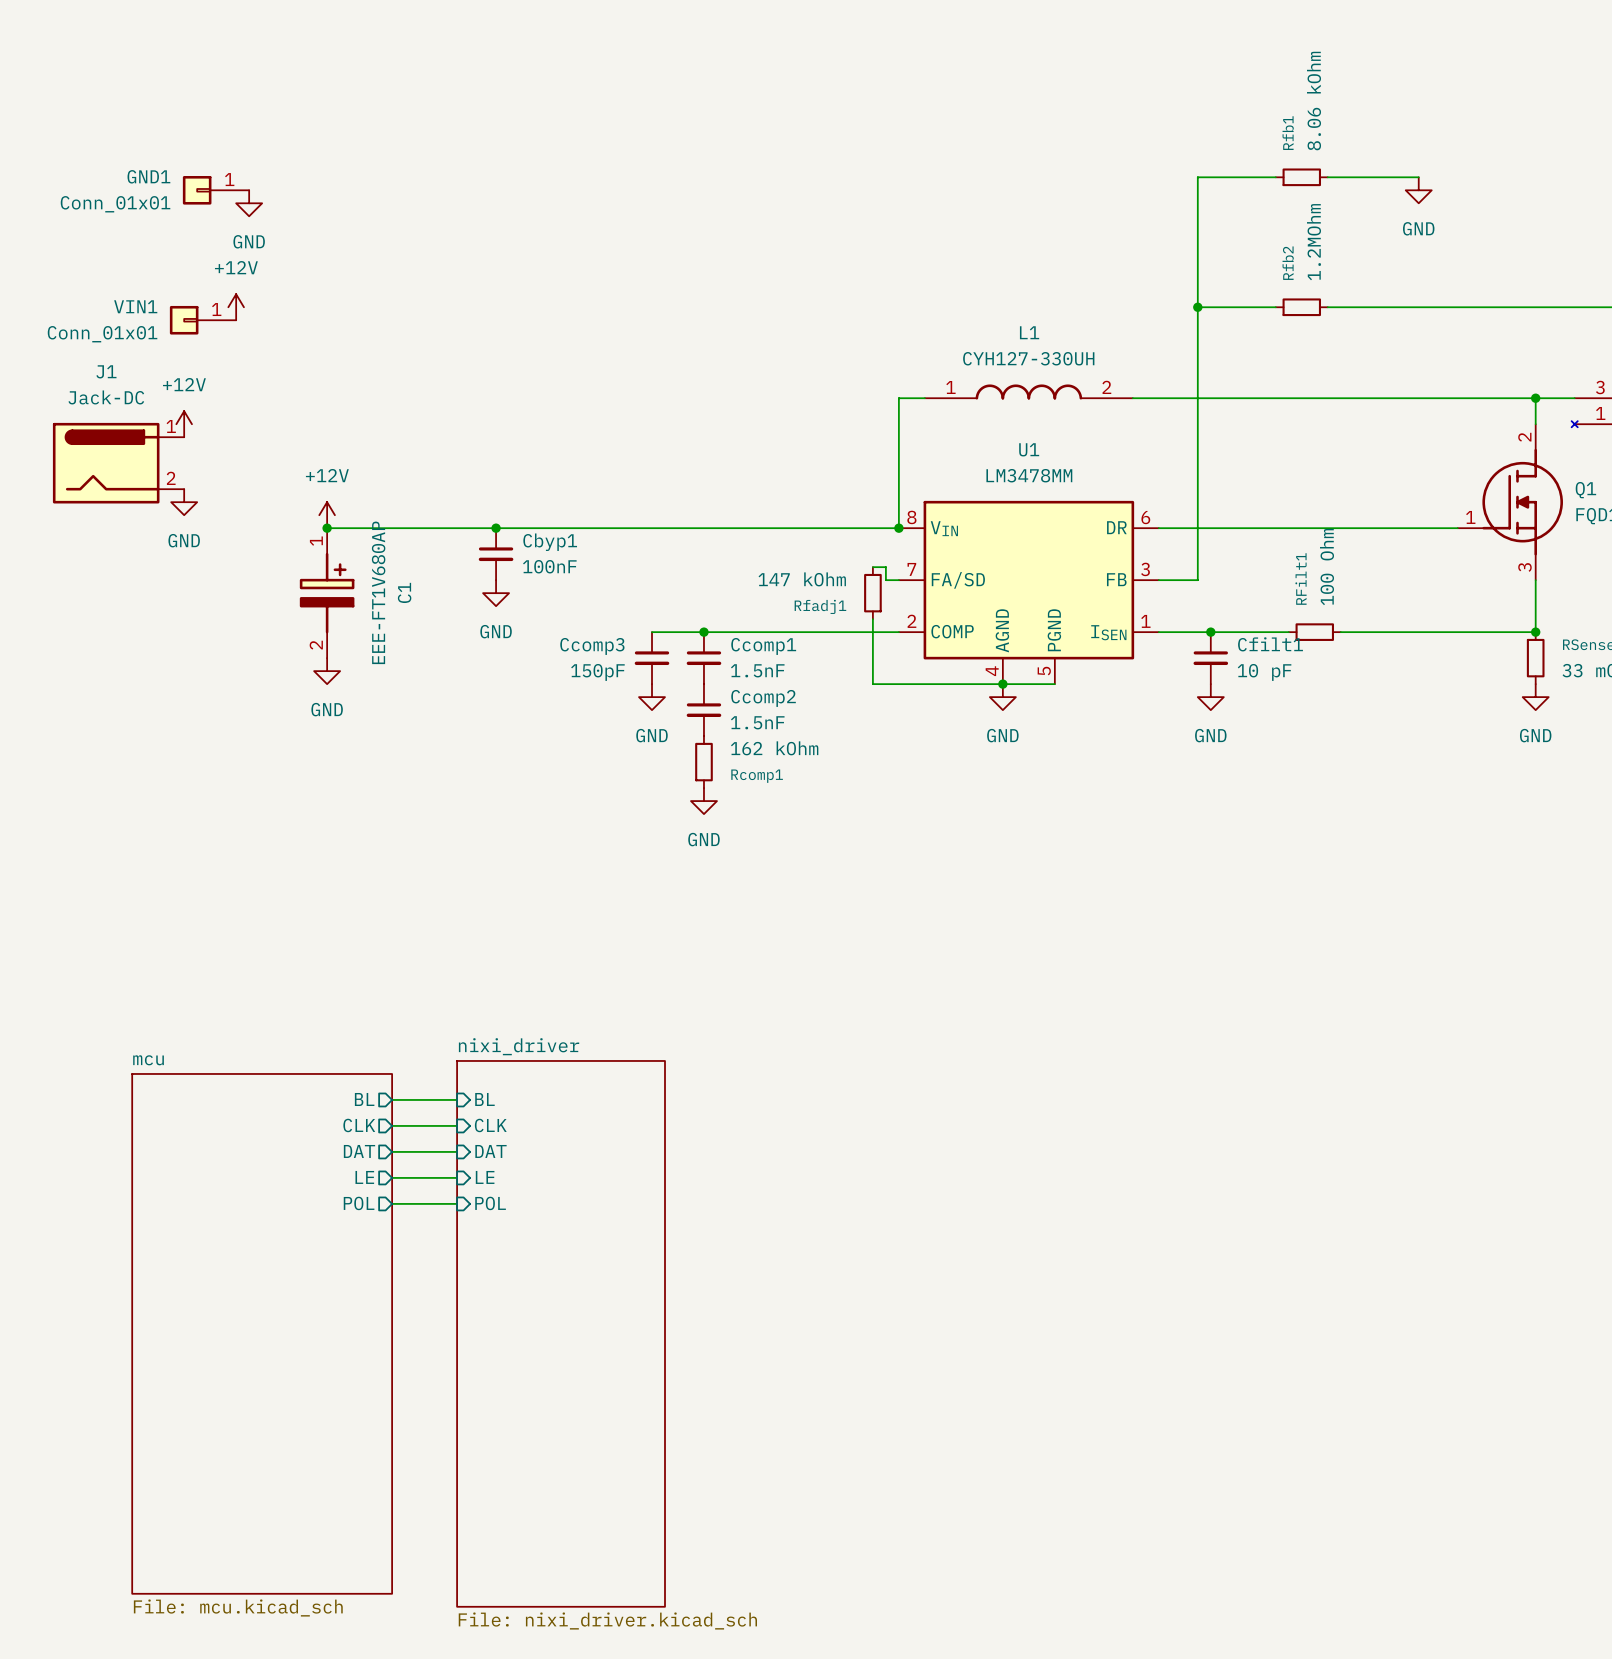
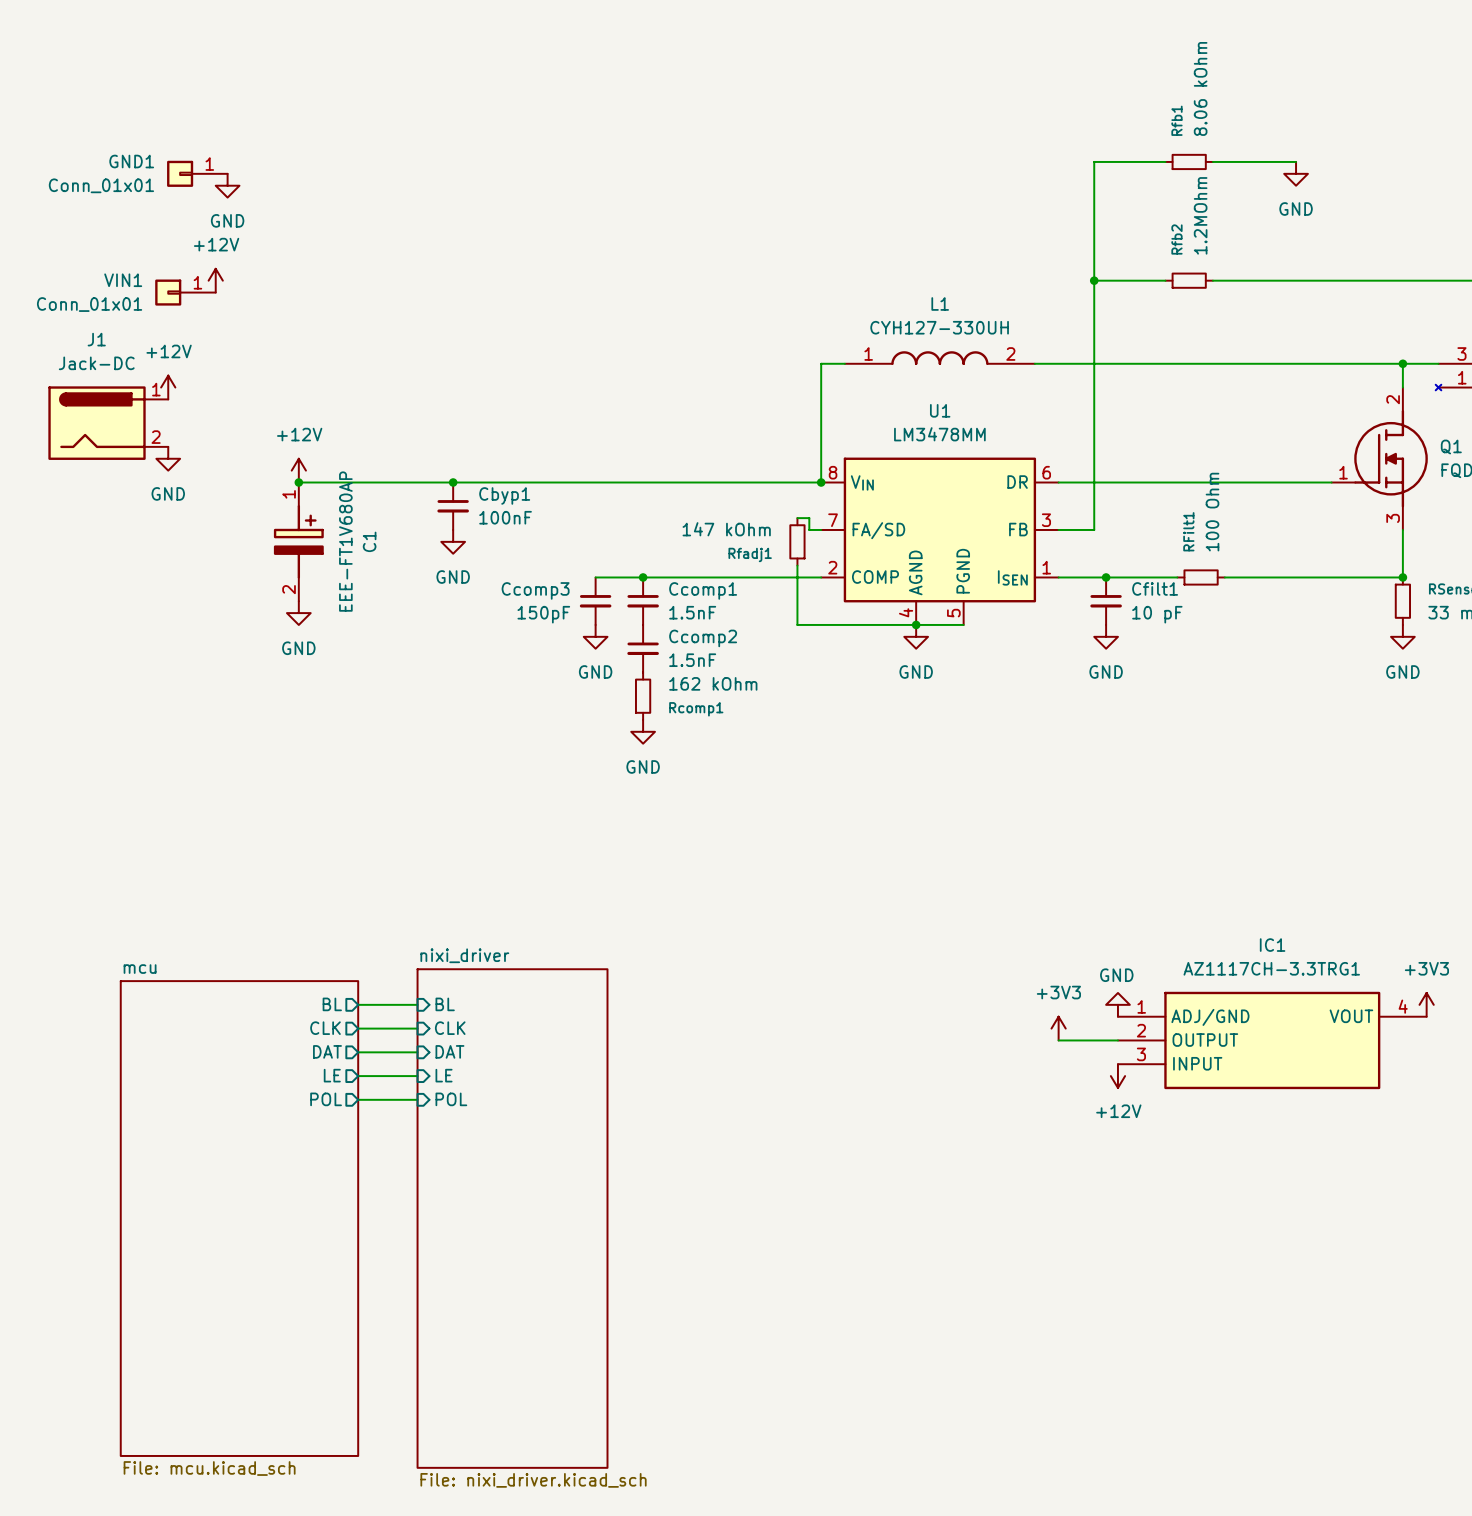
power symbol: none -> GND (1117, 1004)
power symbol: none -> +3V3 (1426, 1004)
power symbol: none -> +3V3 (1058, 1028)
wire: none -> (1058, 1040) (1117, 1040)
IC1: none -> AZ1117CH-3.3TRG1 (1272, 1040)
power symbol: none -> +12V (1117, 1076)

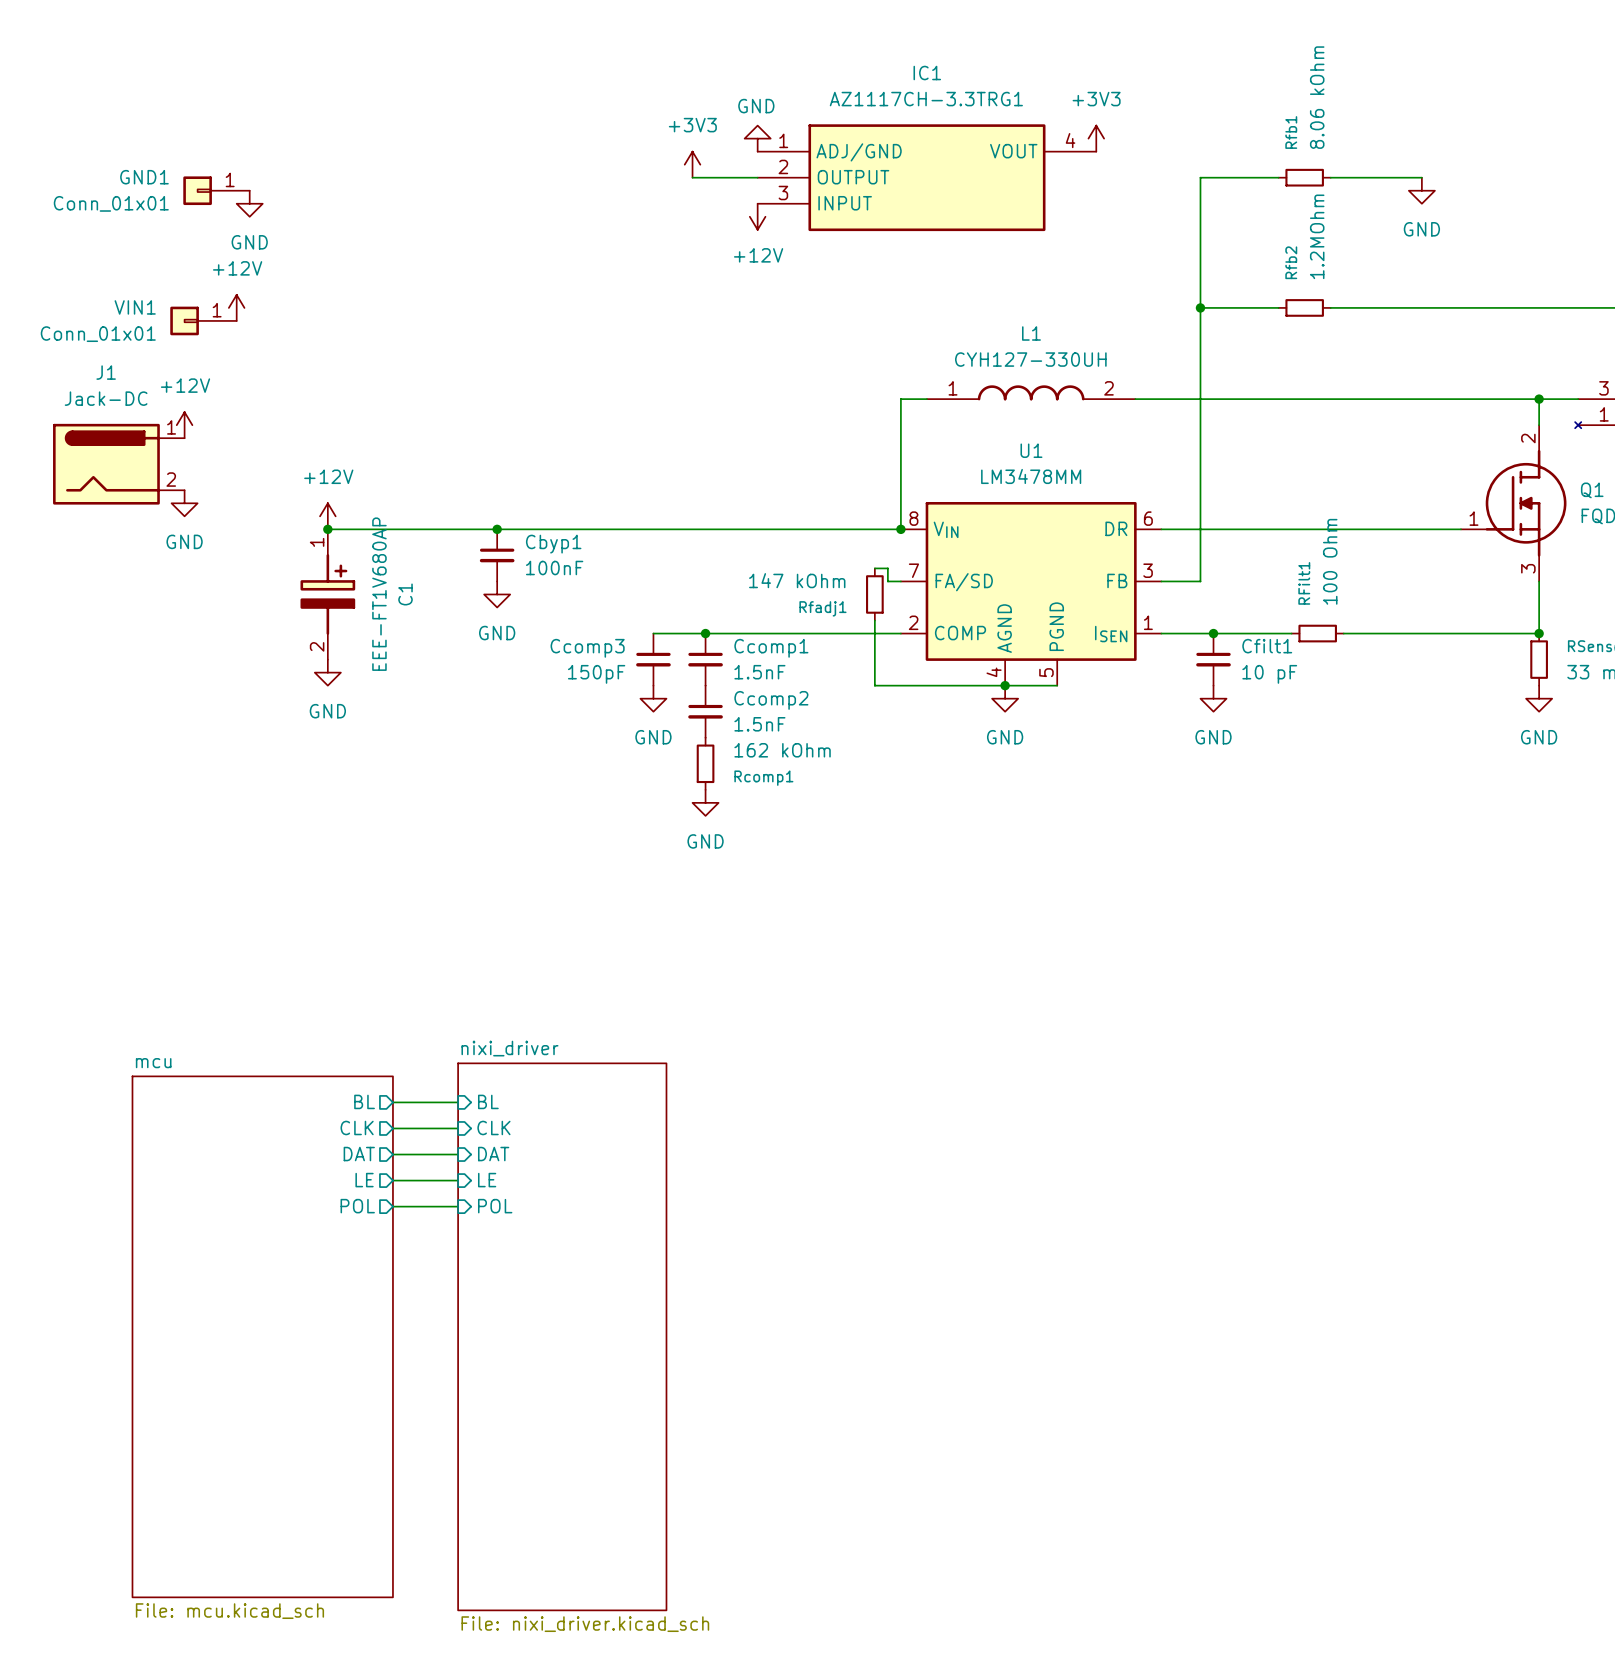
power symbol: none -> GND (757, 138)
power symbol: none -> +3V3 (1096, 138)
power symbol: none -> +3V3 (692, 164)
wire: none -> (692, 177) (757, 177)
power symbol: none -> +12V (757, 216)
power symbol: GND (1117, 1004) -> none
power symbol: +3V3 (1426, 1004) -> none
power symbol: +3V3 (1058, 1028) -> none
wire: (1058, 1040) (1117, 1040) -> none
IC1 position: (1272, 1040) -> (926, 177)
power symbol: +12V (1117, 1076) -> none

